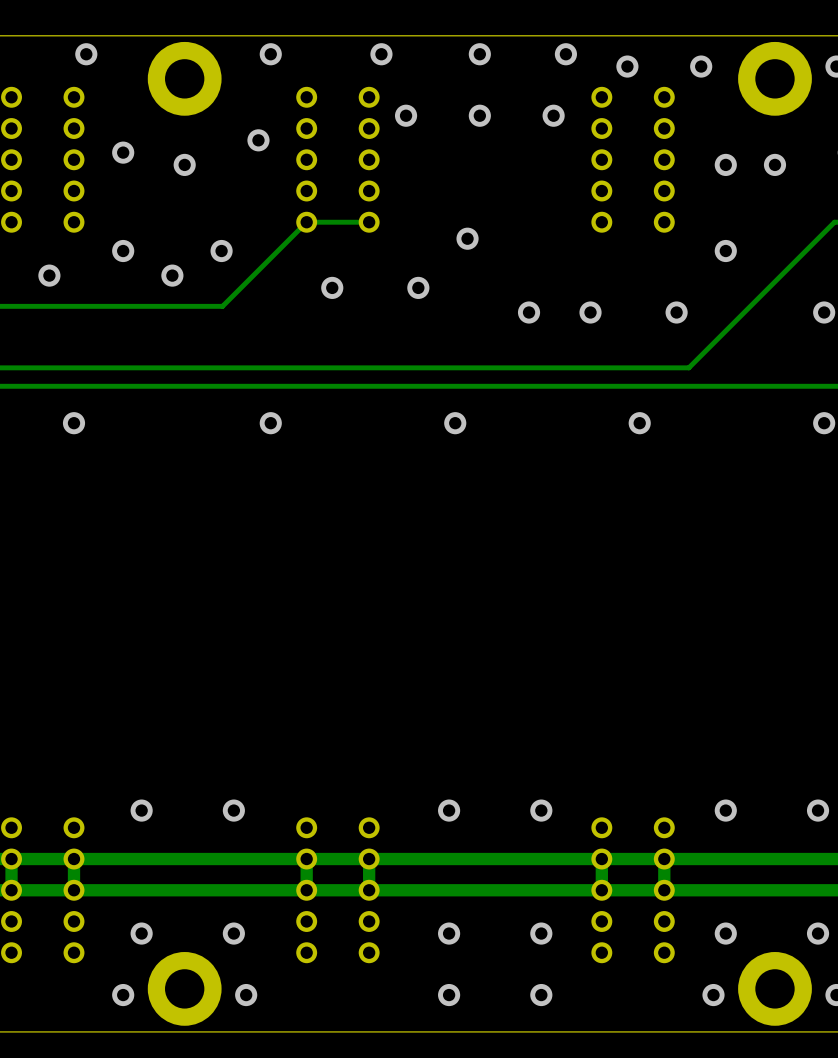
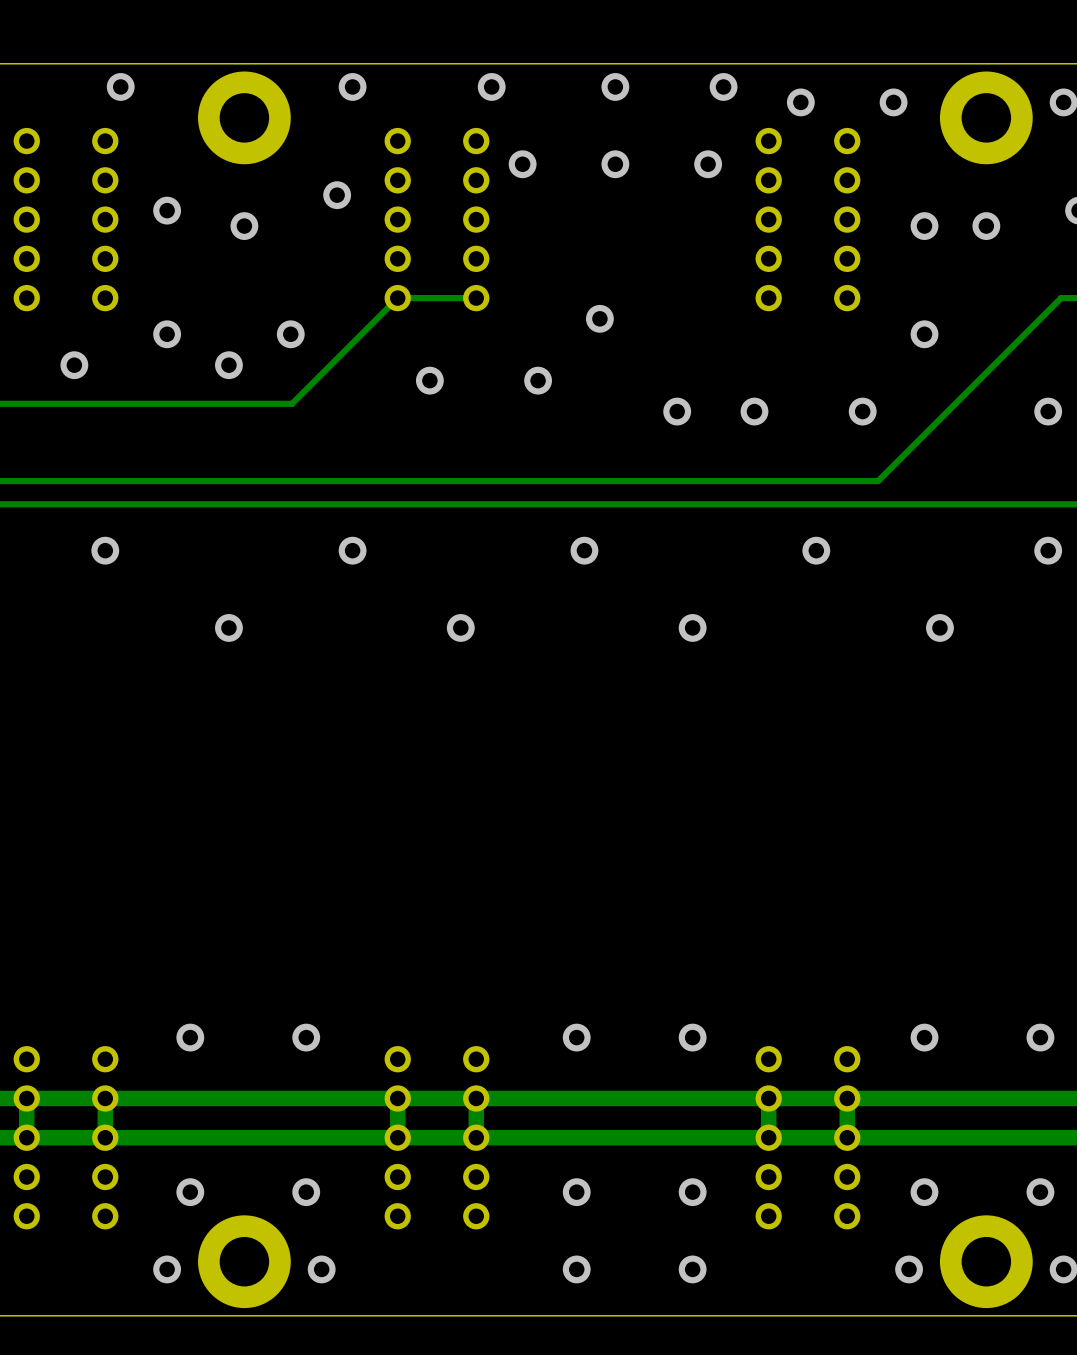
via: none -> (228, 627)
via: none -> (460, 627)
via: none -> (692, 627)
via: none -> (939, 627)

